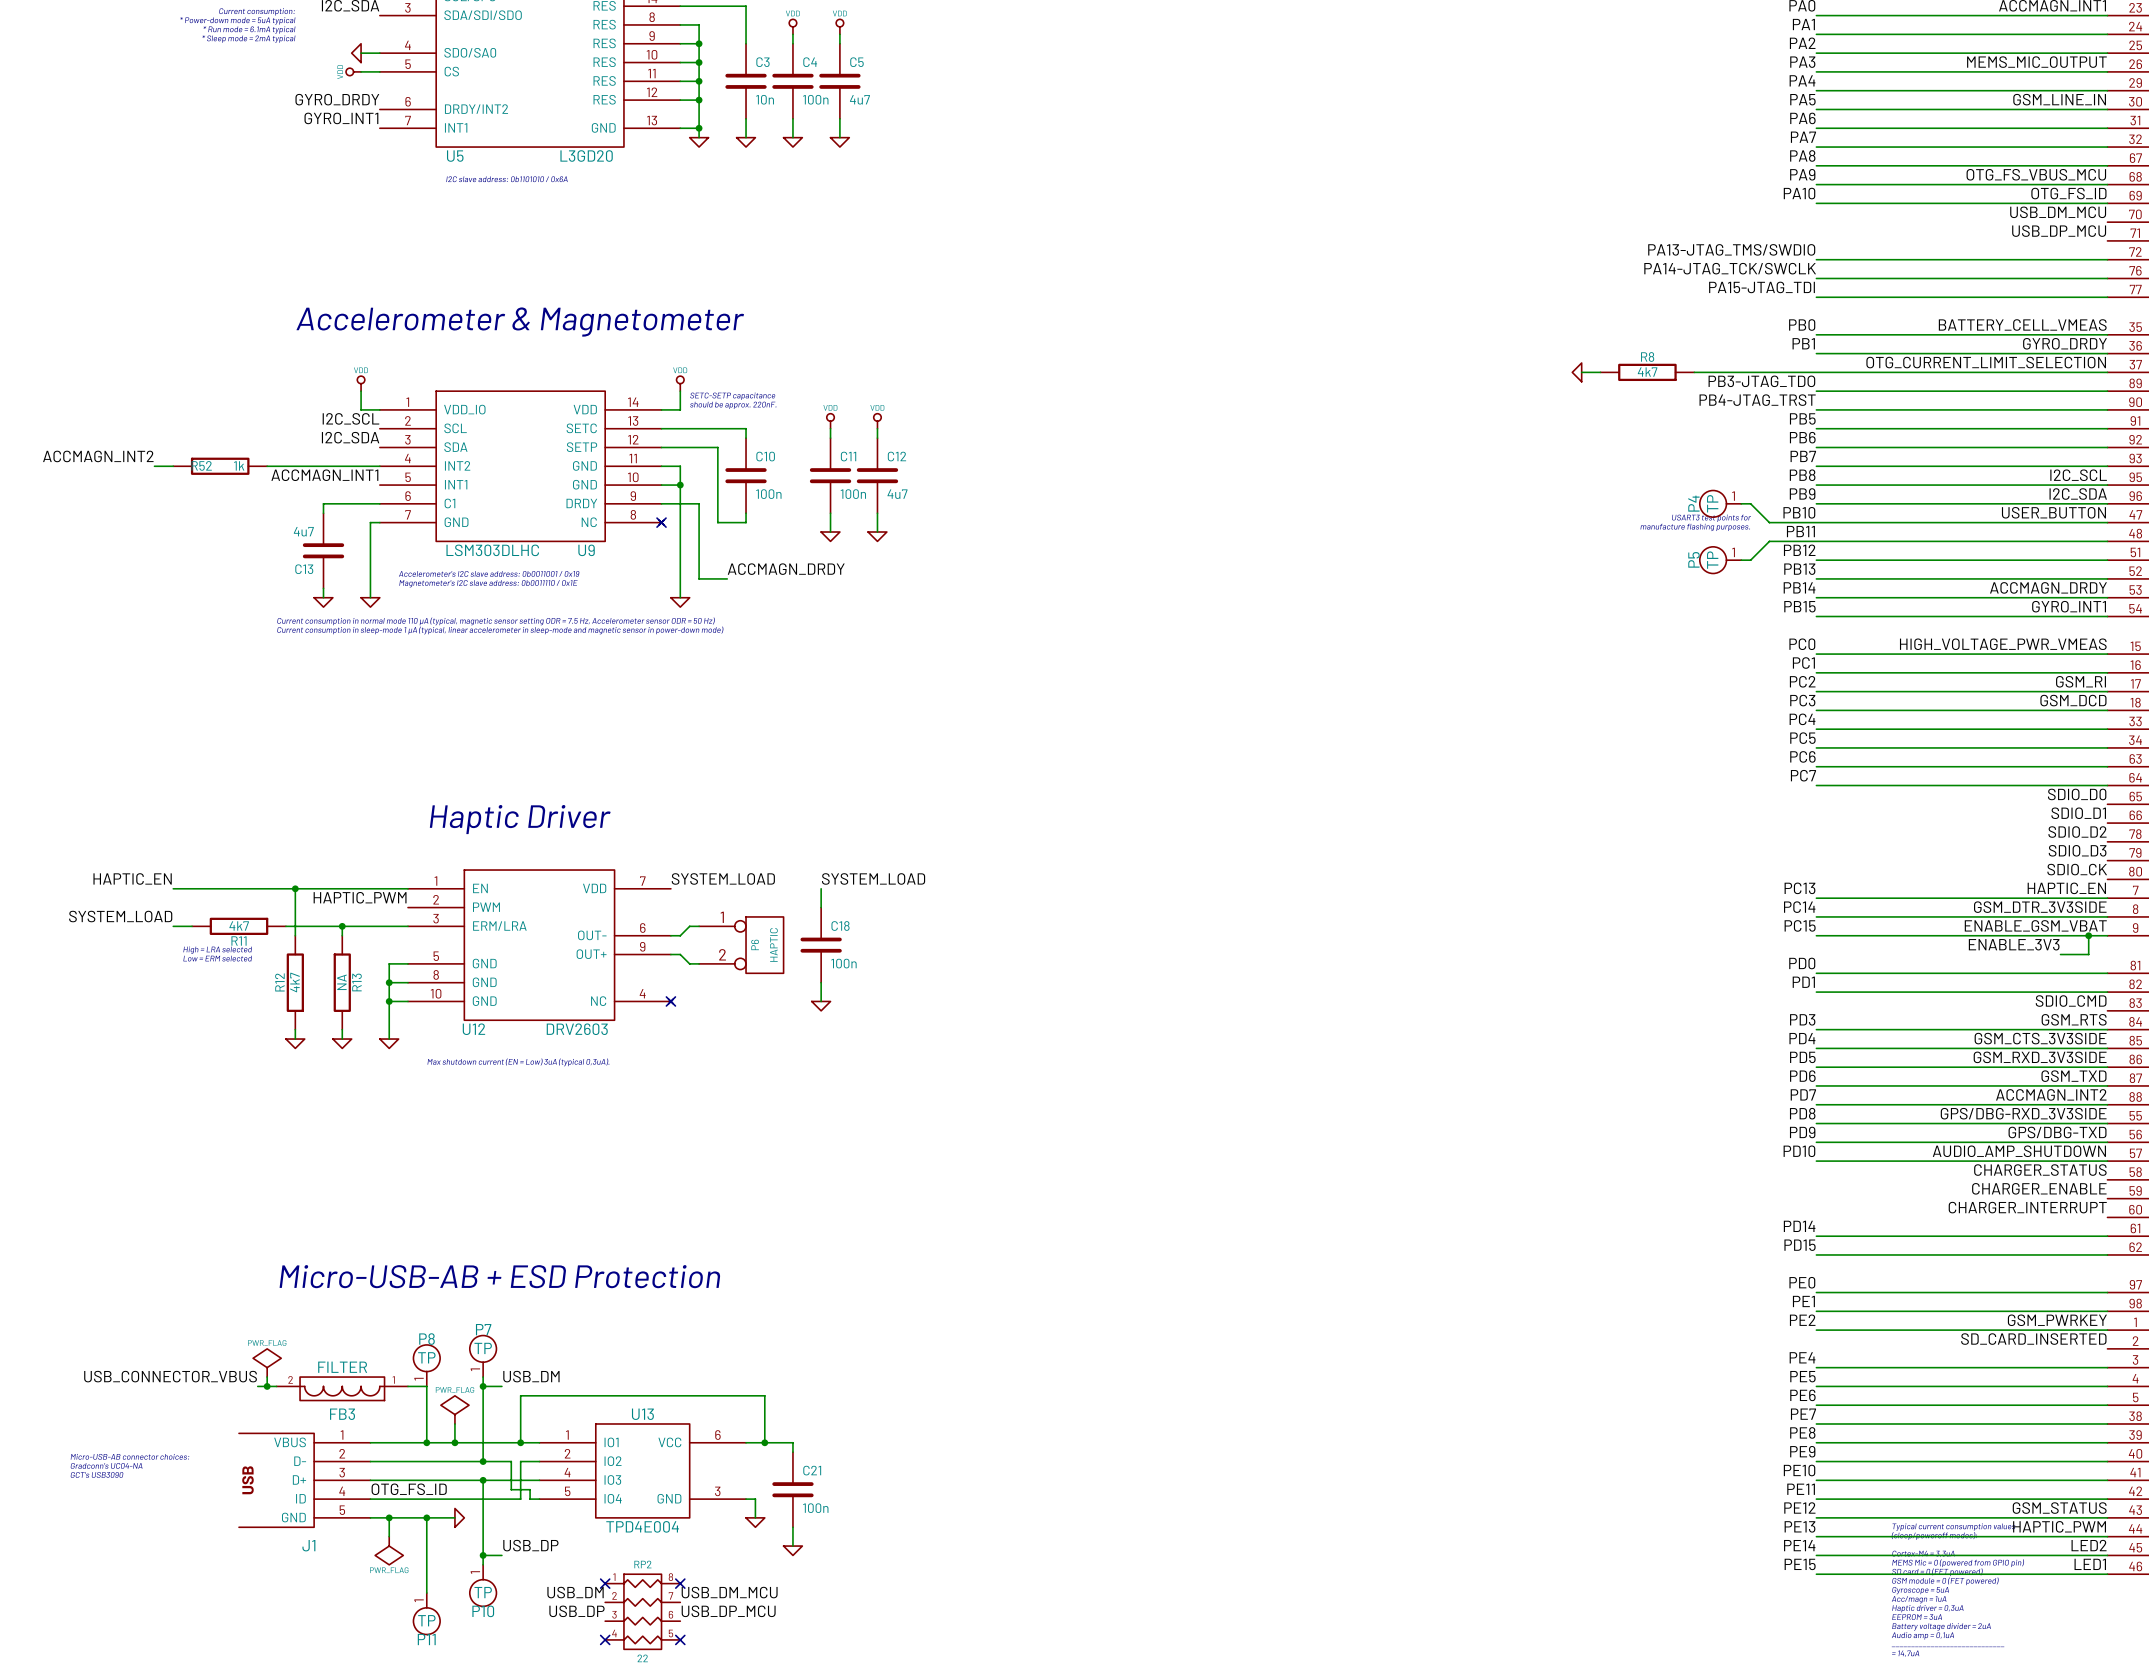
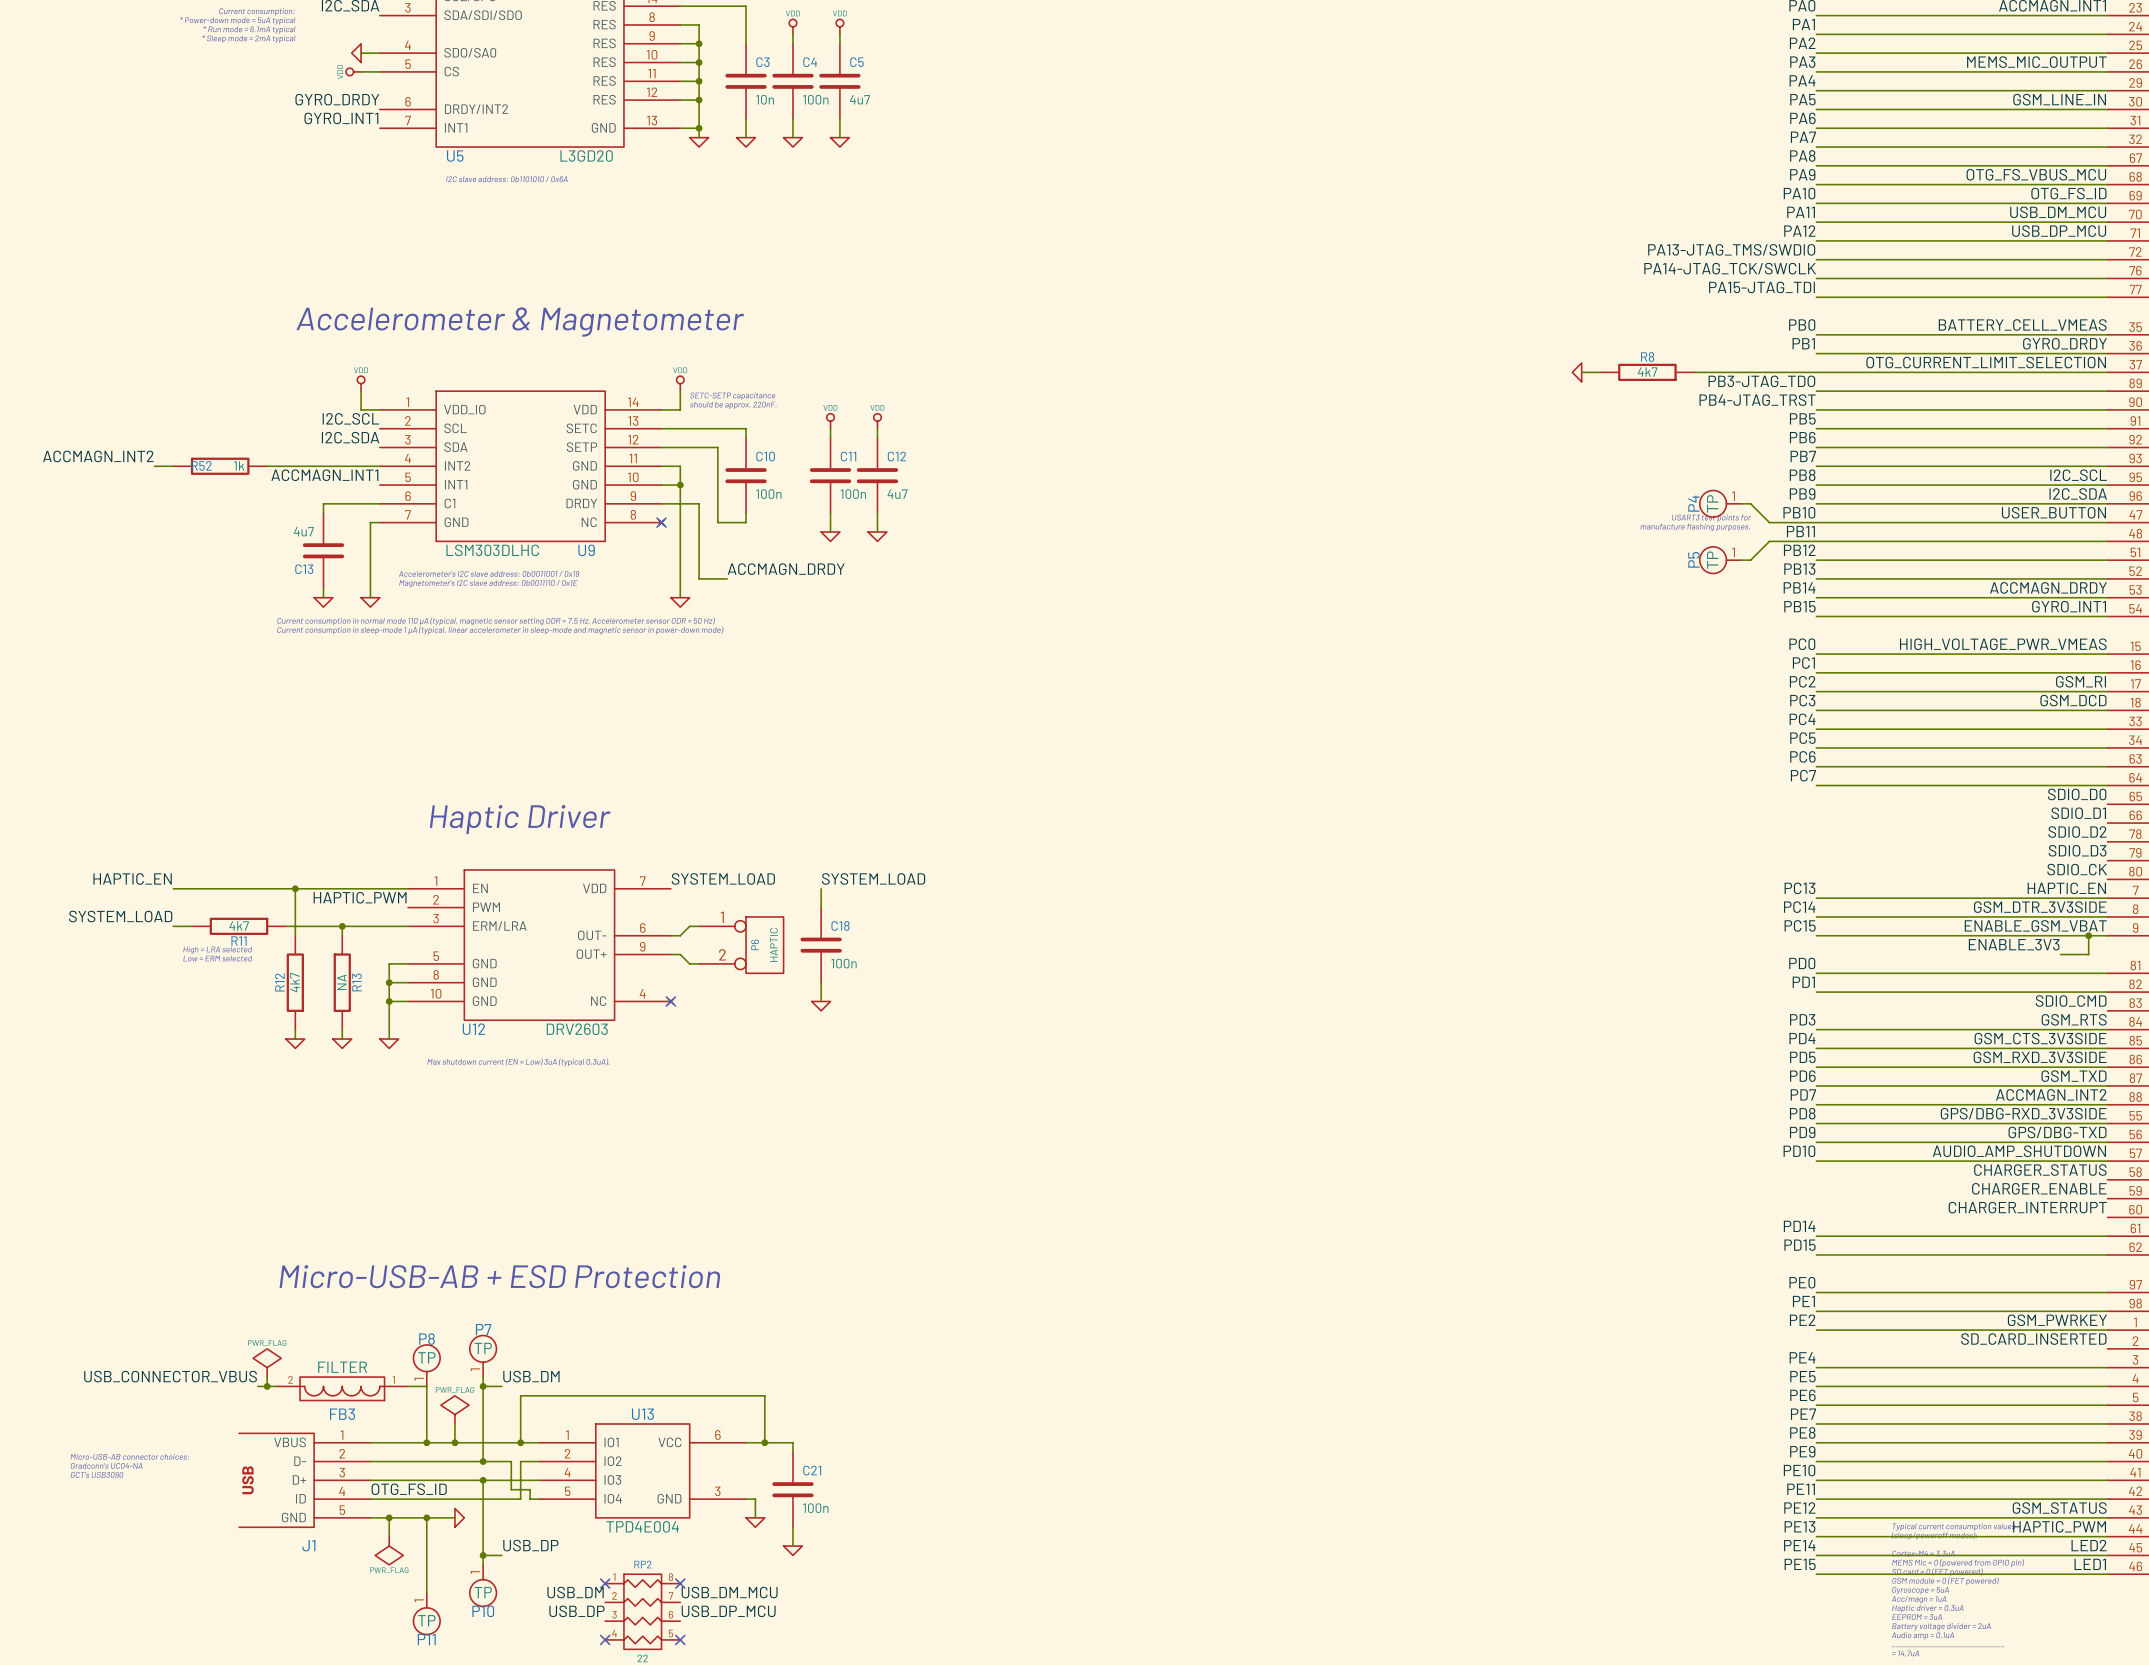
label: none -> PA11 (1801, 212)
wire: none -> (1816, 222) (2107, 222)
label: none -> PA12 (1799, 231)
wire: none -> (1816, 240) (2107, 240)

